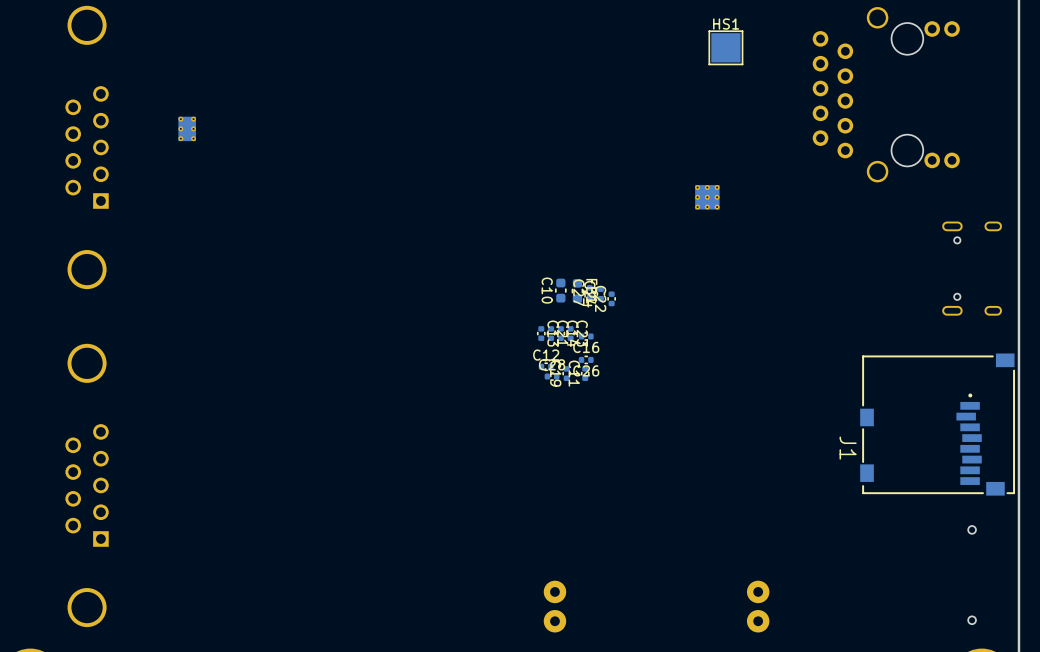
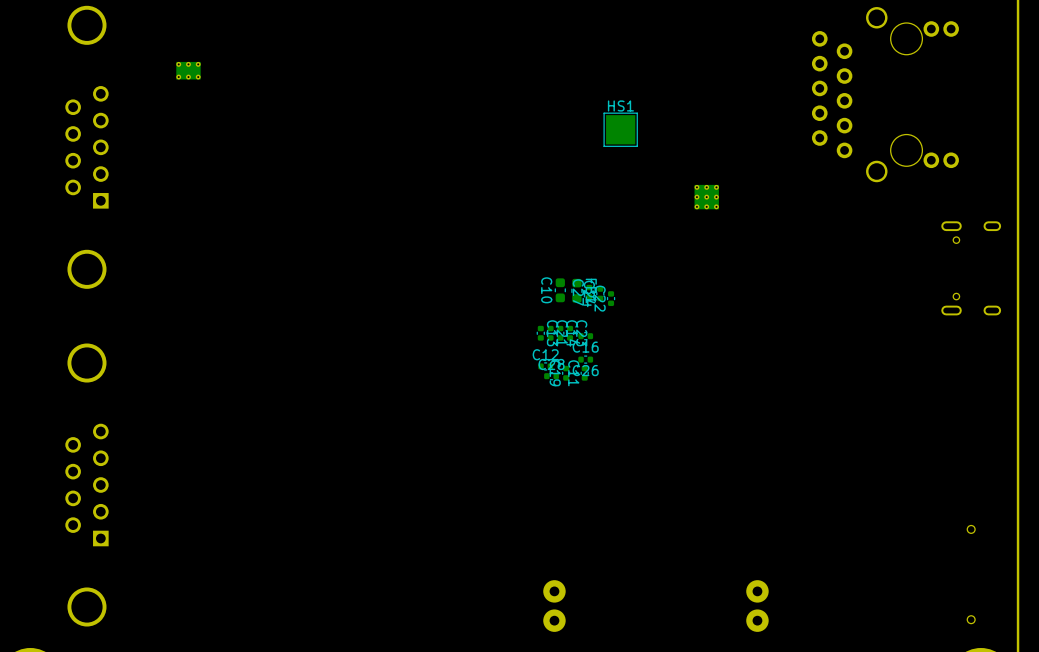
HS1 position: (725, 47) -> (620, 129)
part rotation: 0° (187, 128) -> 90° clockwise (188, 70)
part position: (187, 128) -> (188, 70)
J1: (937, 424) -> none

